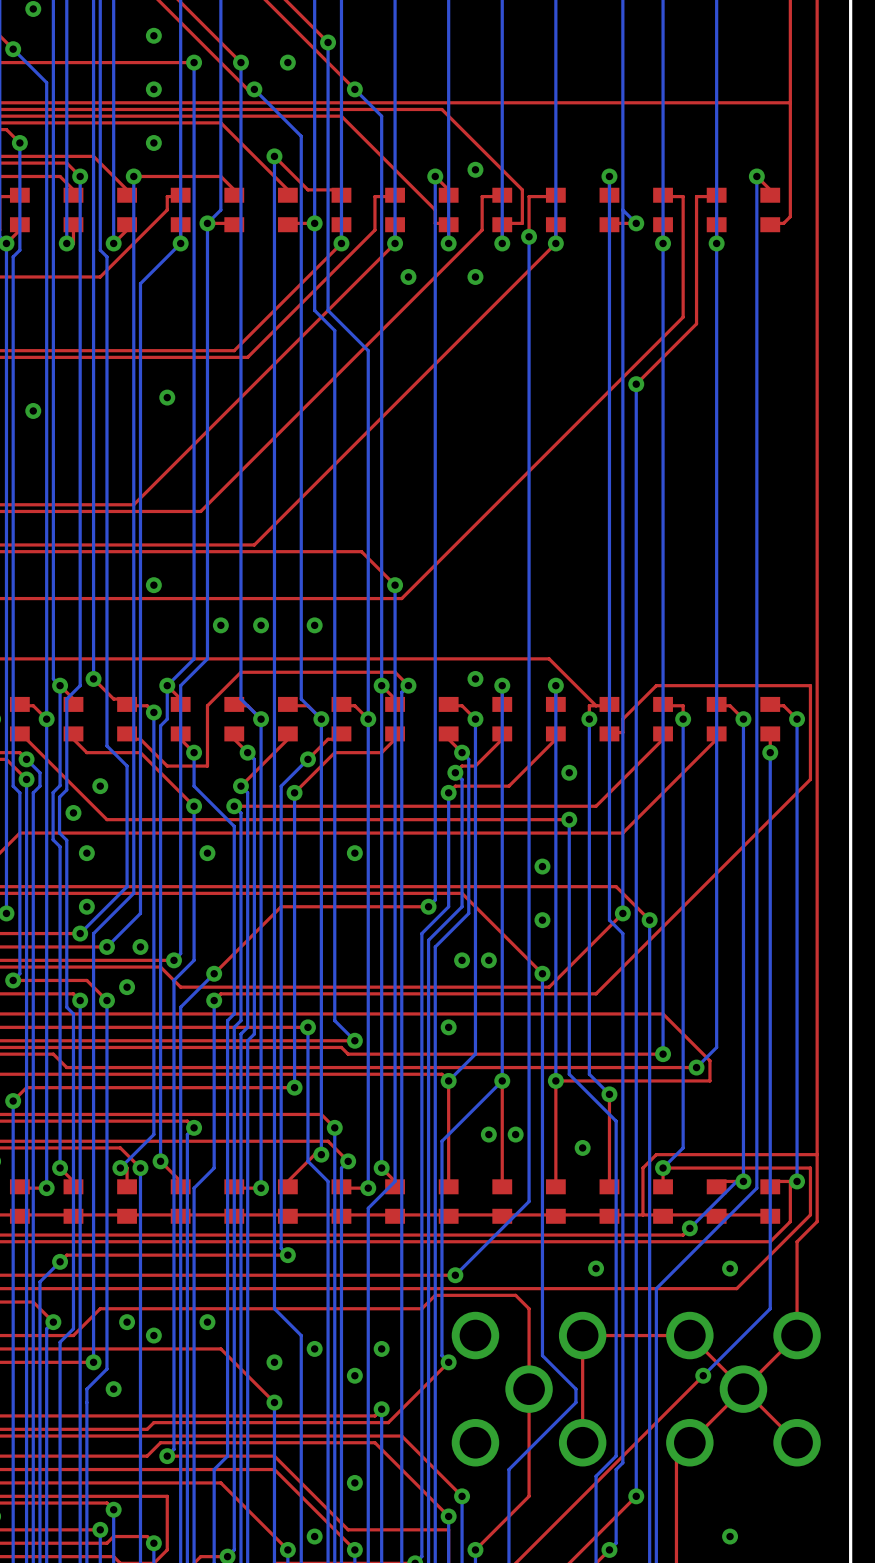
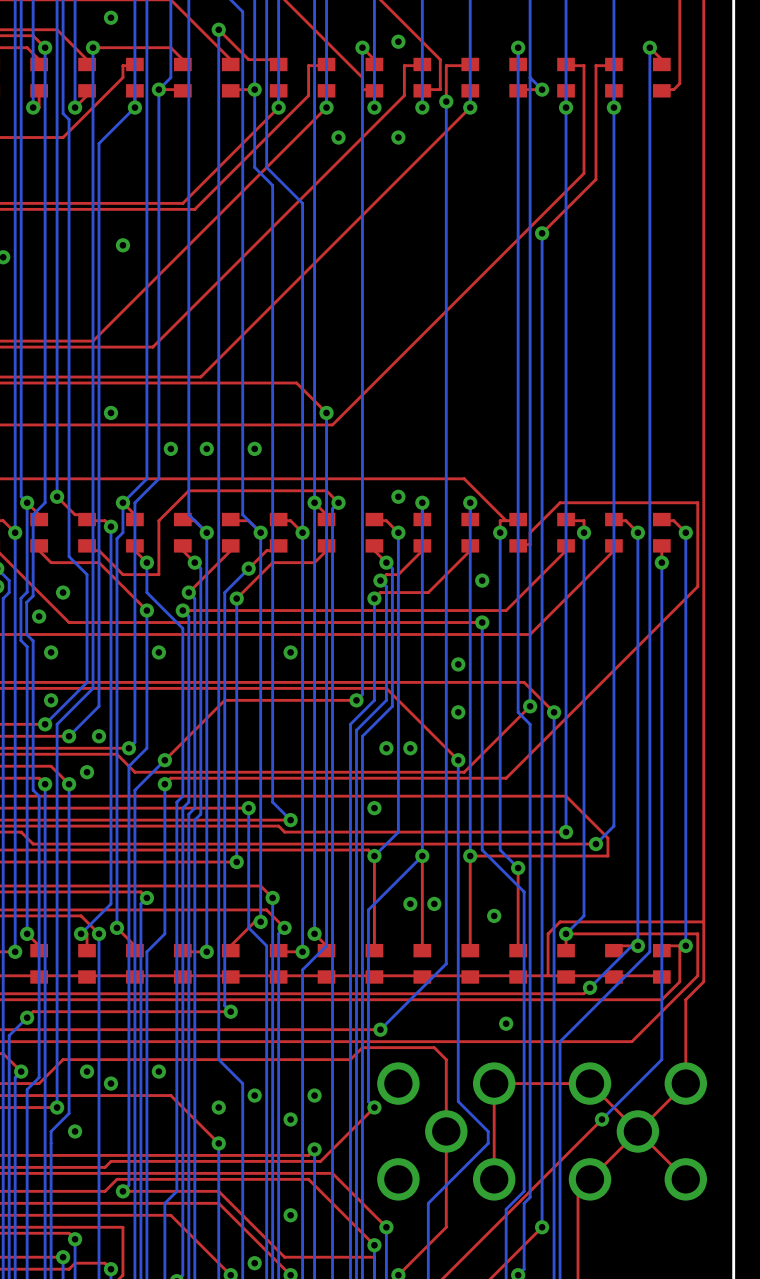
via: (730, 1268) -> none
via: (730, 1536) -> none

